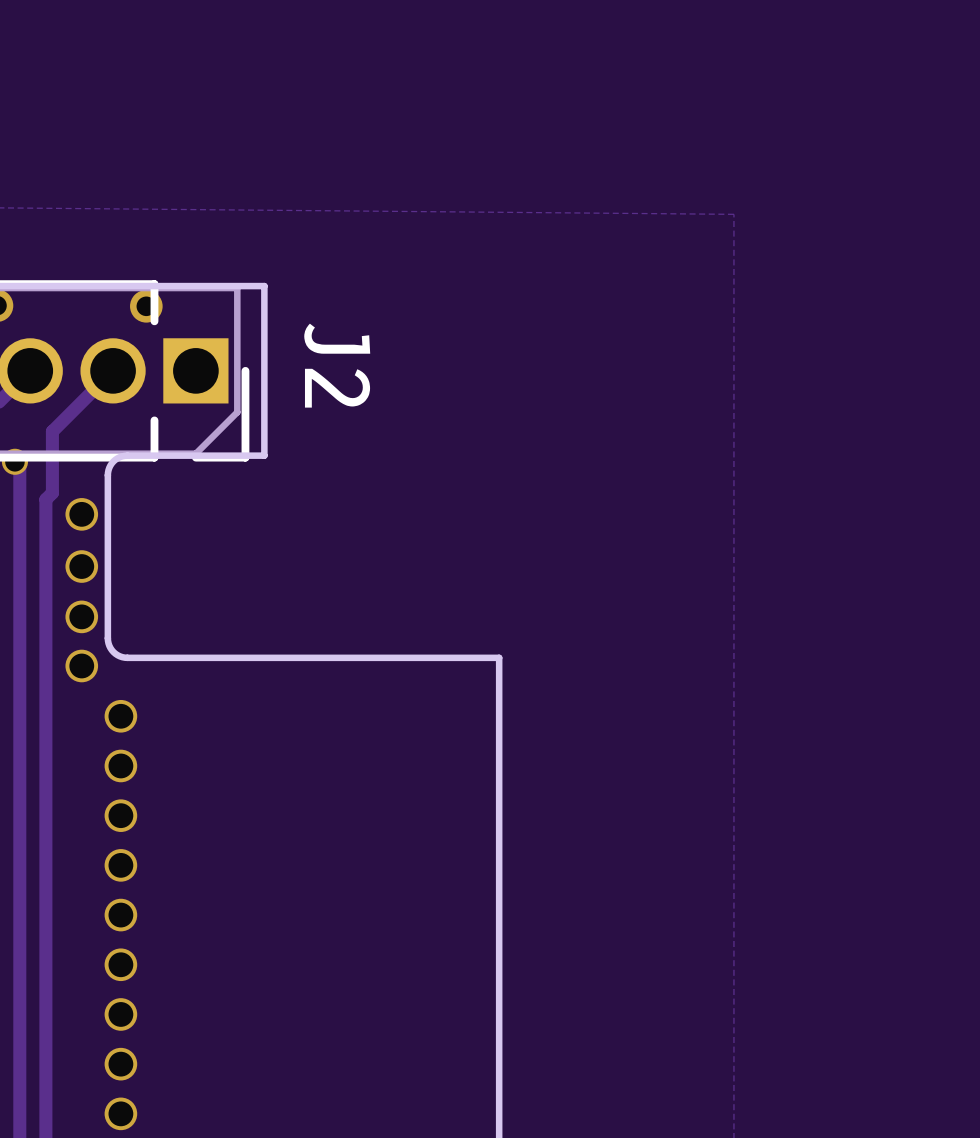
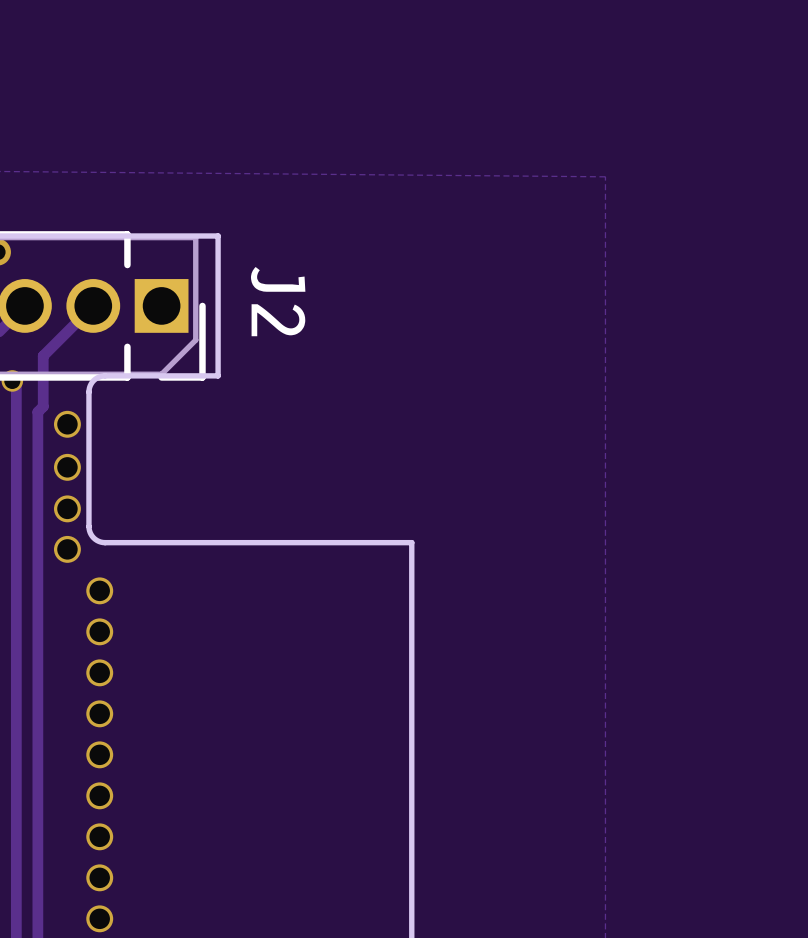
via: (146, 306) -> none

